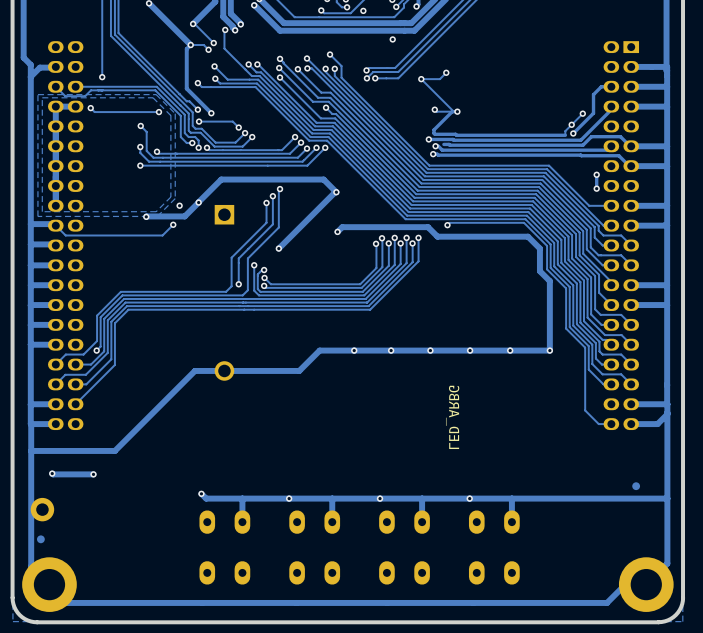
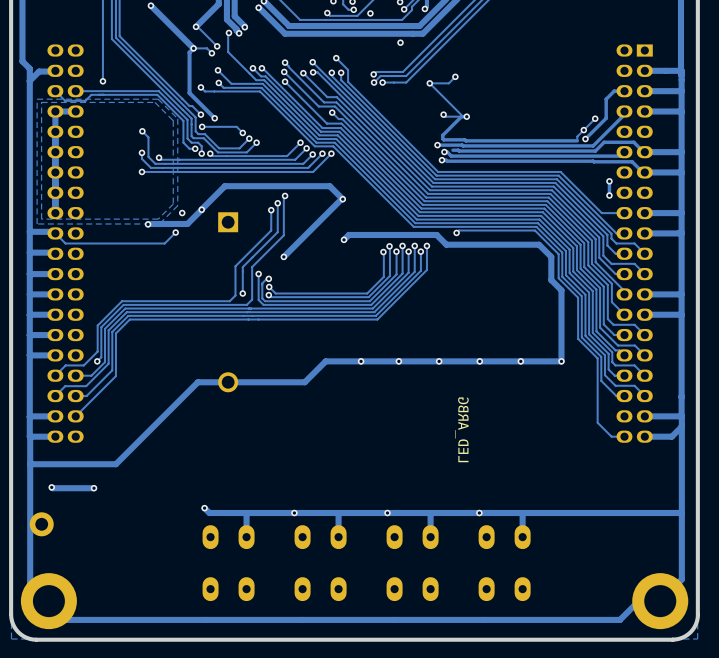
track: (90, 108) (94, 112) (158, 112) -> none
via: (90, 108) -> none
via: (158, 112) -> none
part: (636, 486) -> none
part: (40, 539) -> none

